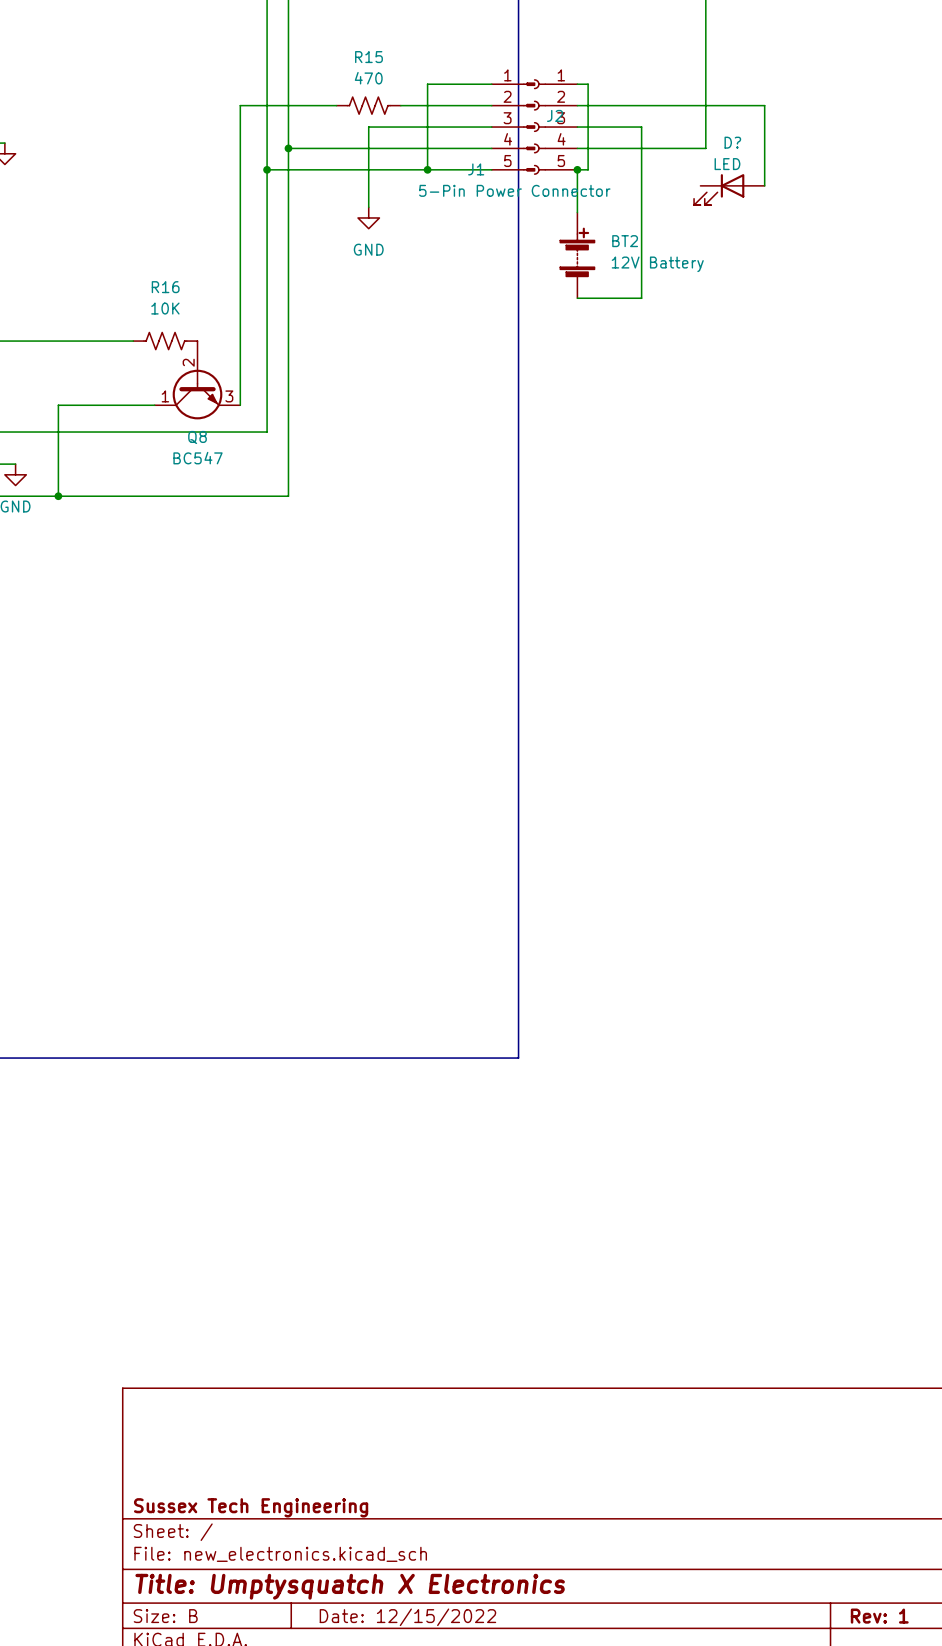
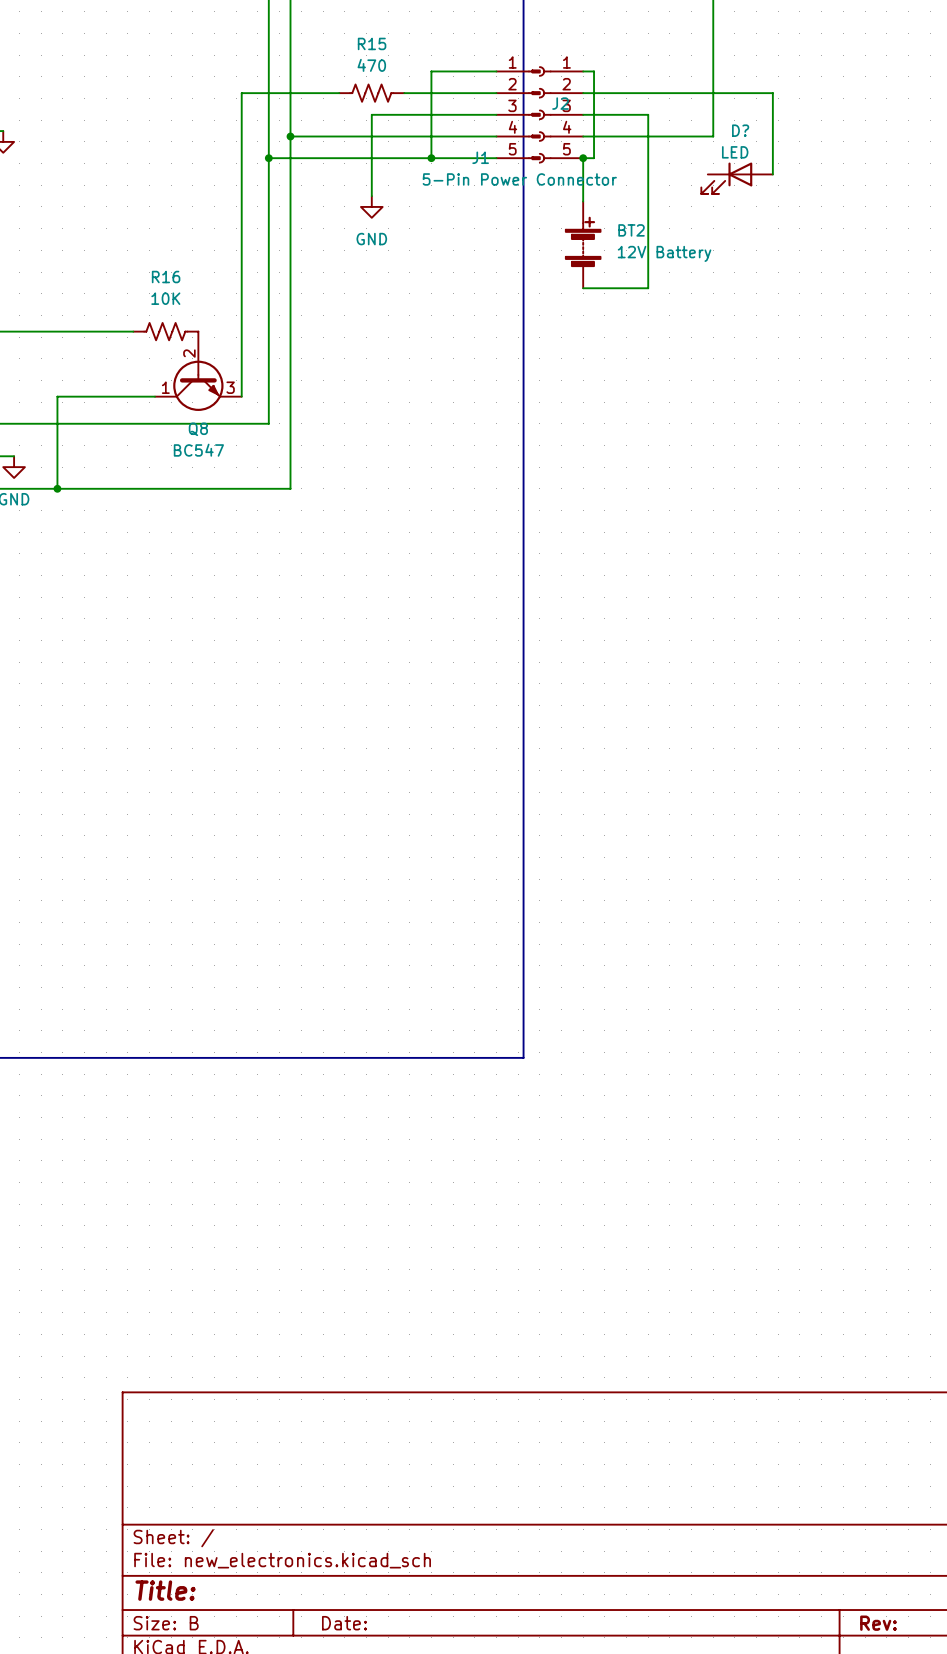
title block: Sussex Tech Engineering (251, 1507) -> none
title block: Title: Umptysquatch X Electronics (350, 1586) -> Title: (165, 1590)
title block: Rev: 1 (879, 1616) -> Rev: (878, 1623)
title block: Date: 12/15/2022 (407, 1617) -> Date: (344, 1623)

